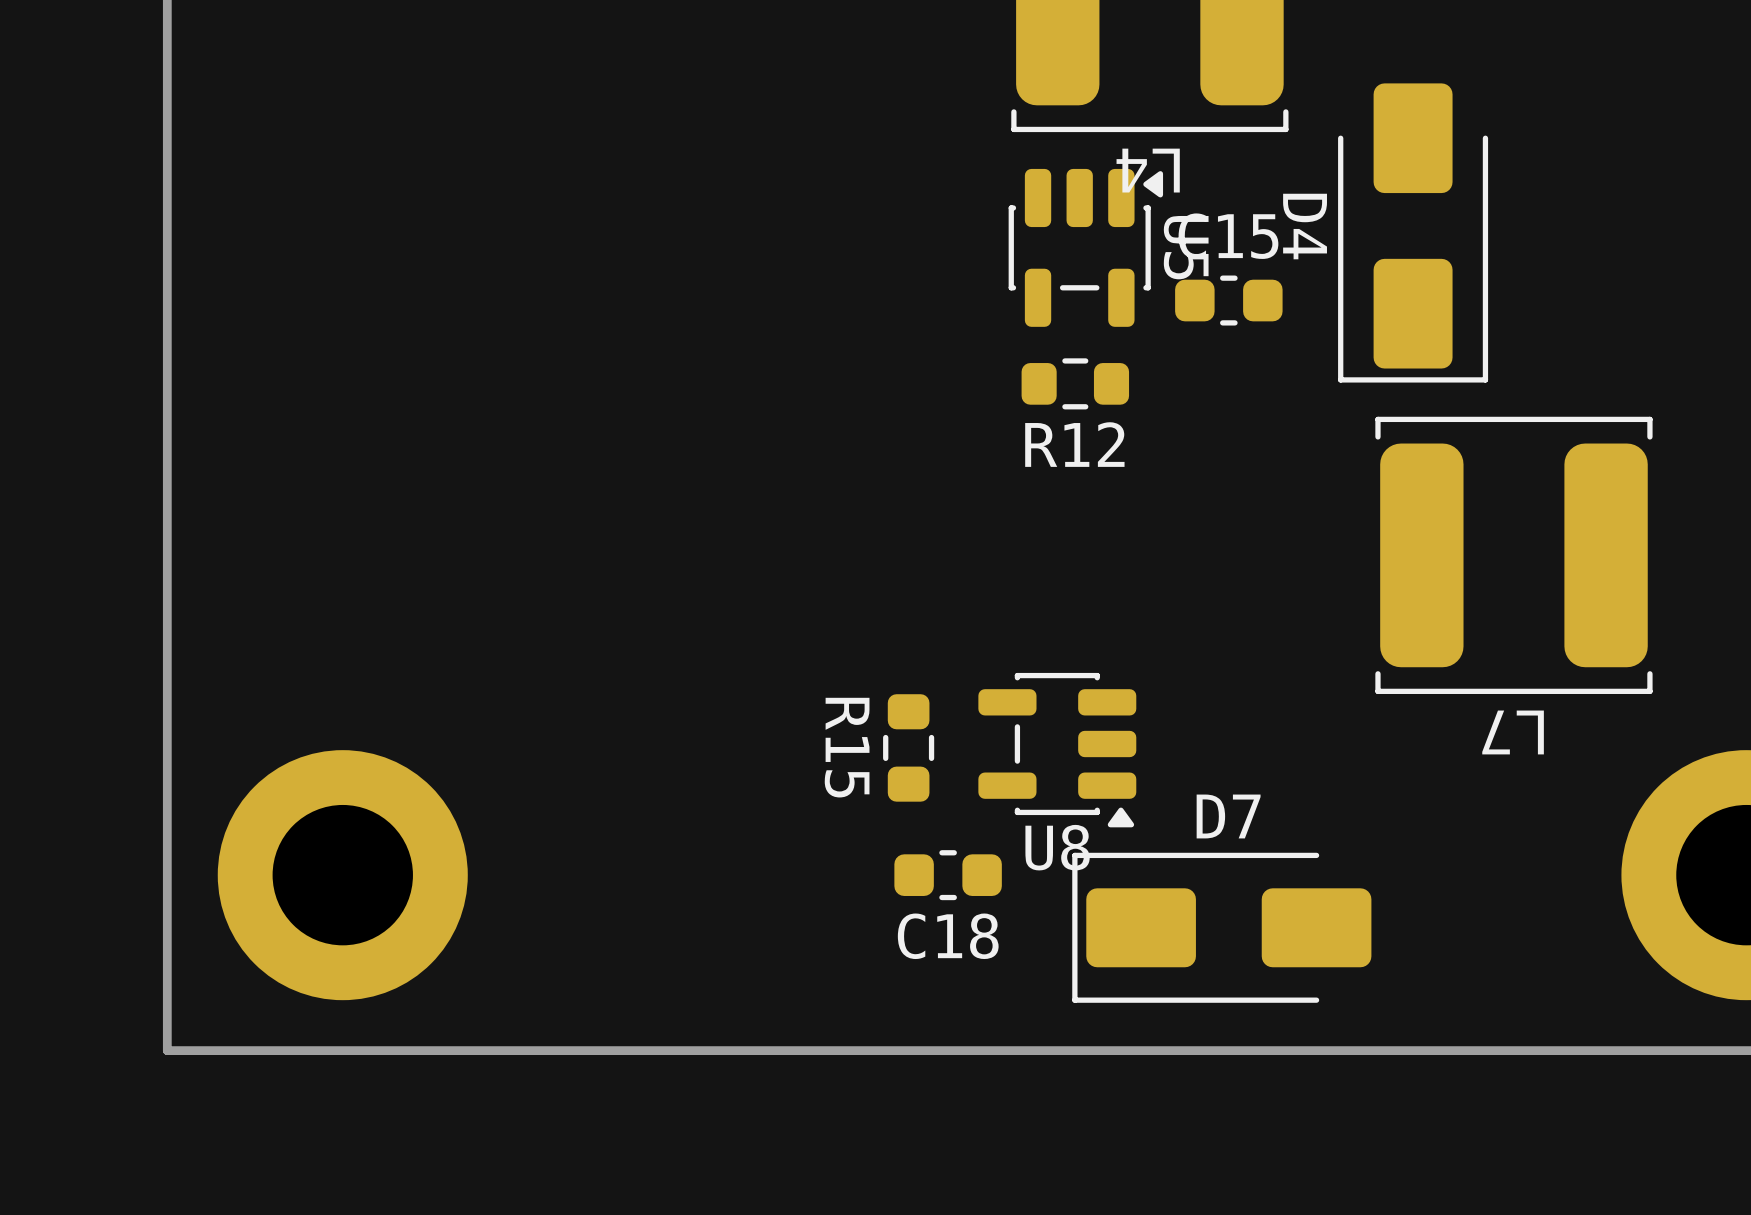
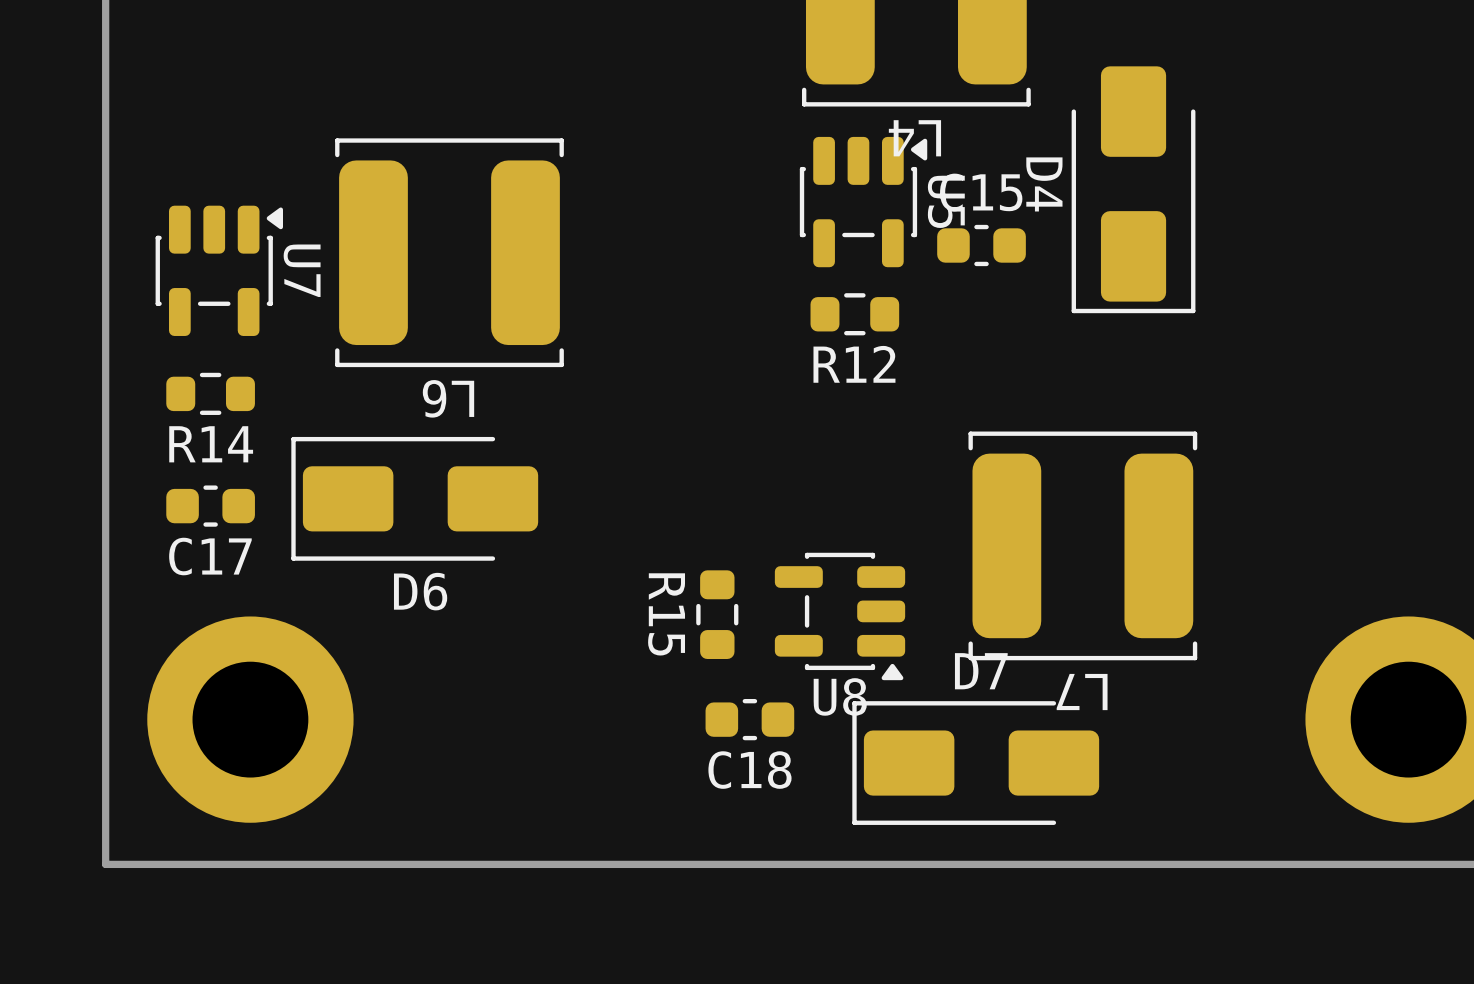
L6: none -> (449, 252)
U7: none -> (219, 270)
R14: none -> (210, 393)
L7 position: (1513, 555) -> (1082, 545)
D6: none -> (414, 498)
C17: none -> (210, 506)

